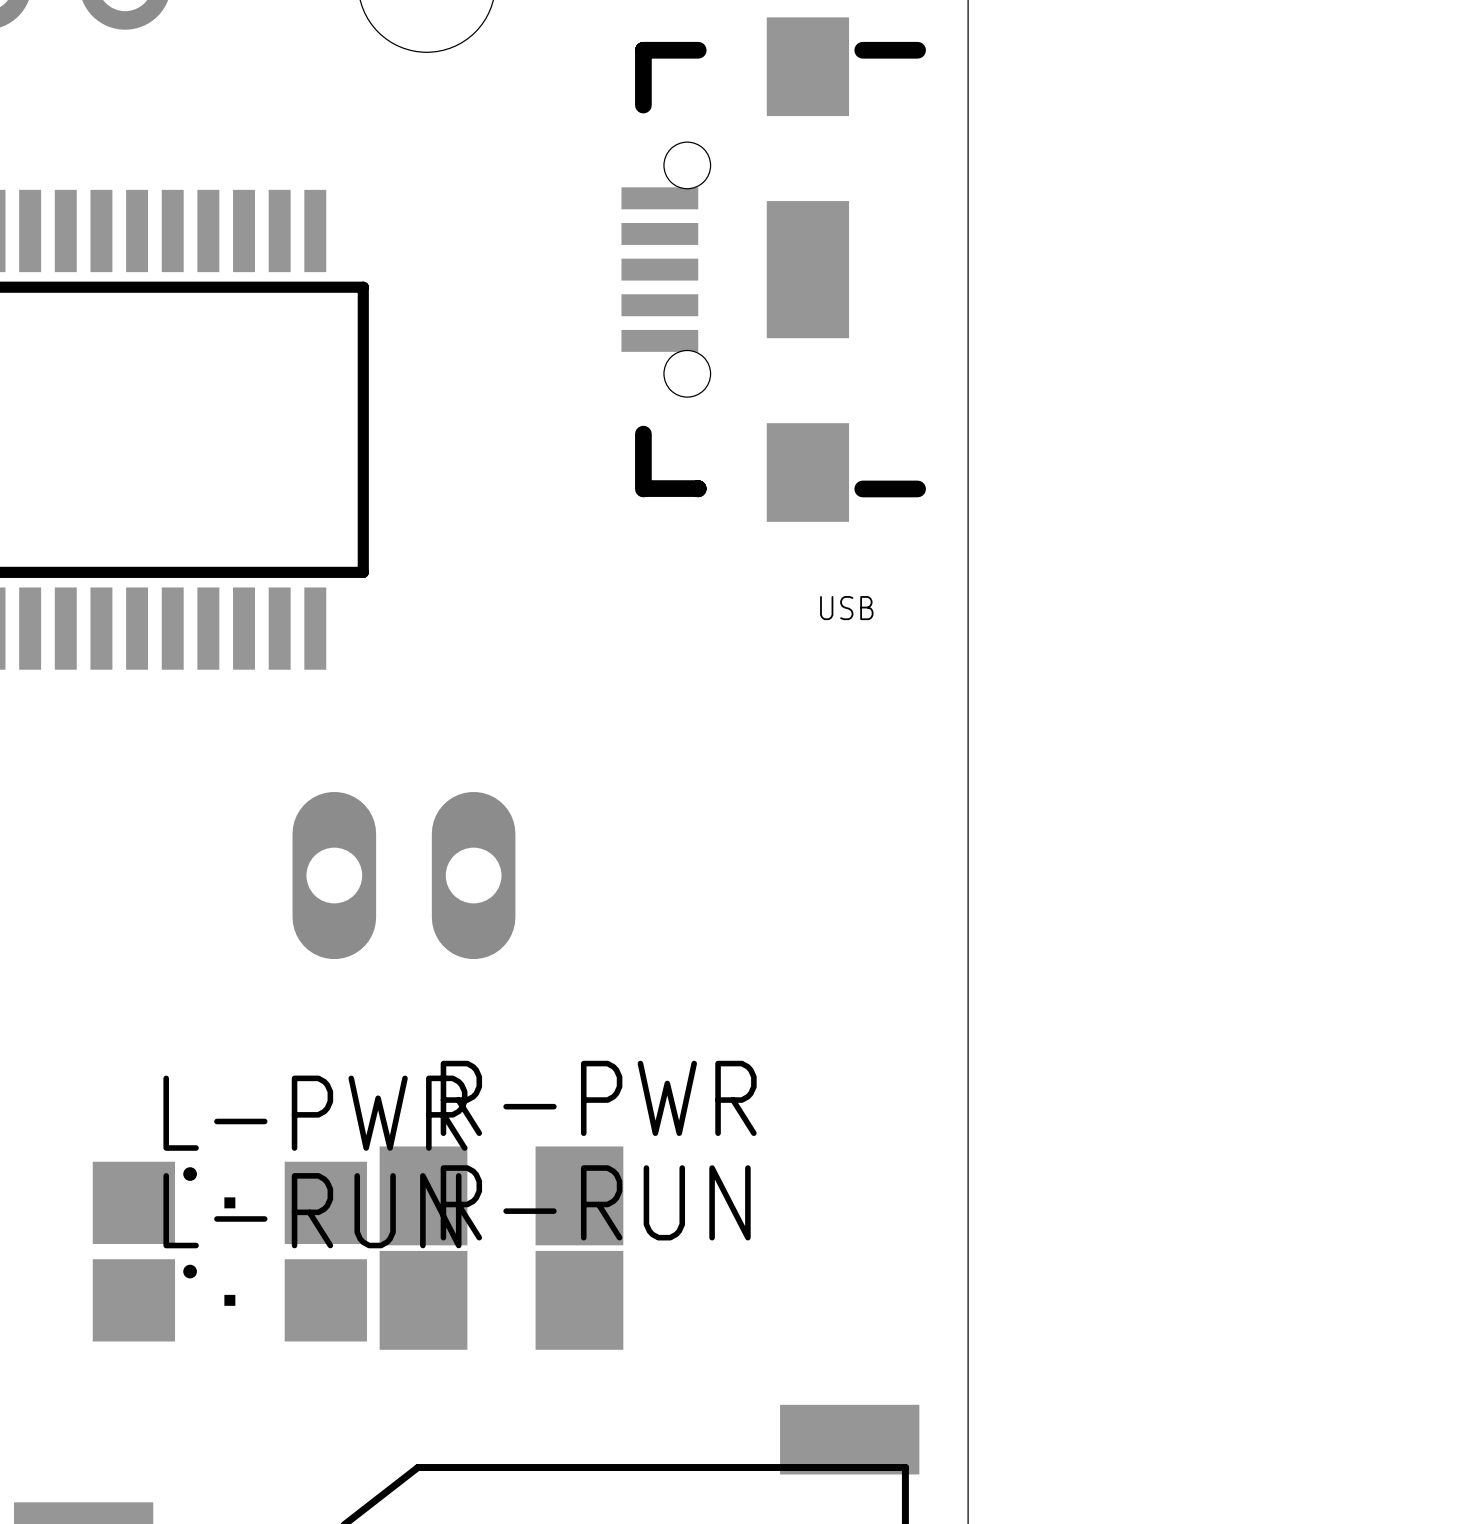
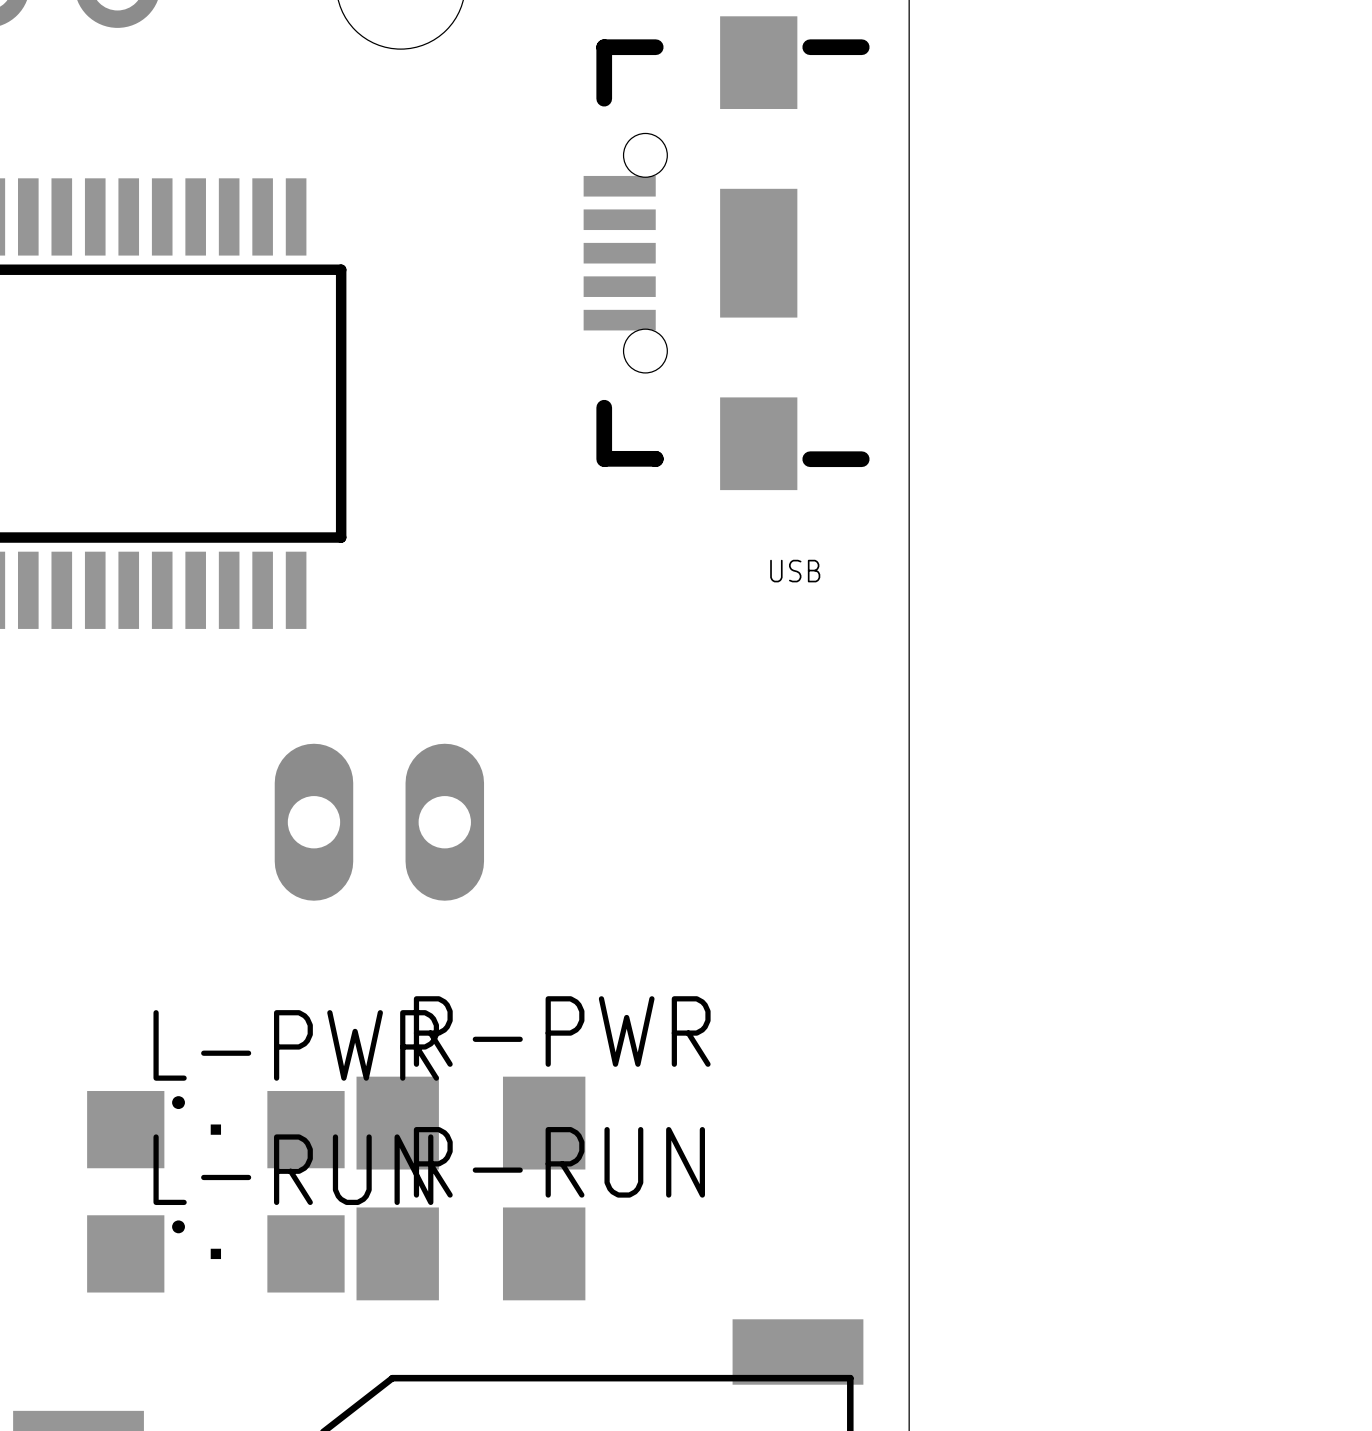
L-RUN position: (229, 1300) -> (215, 1253)
R-RUN position: (501, 1300) -> (470, 1253)

